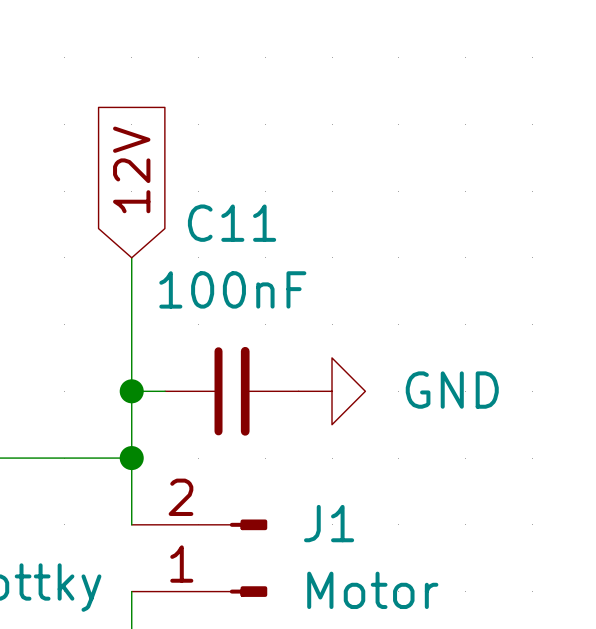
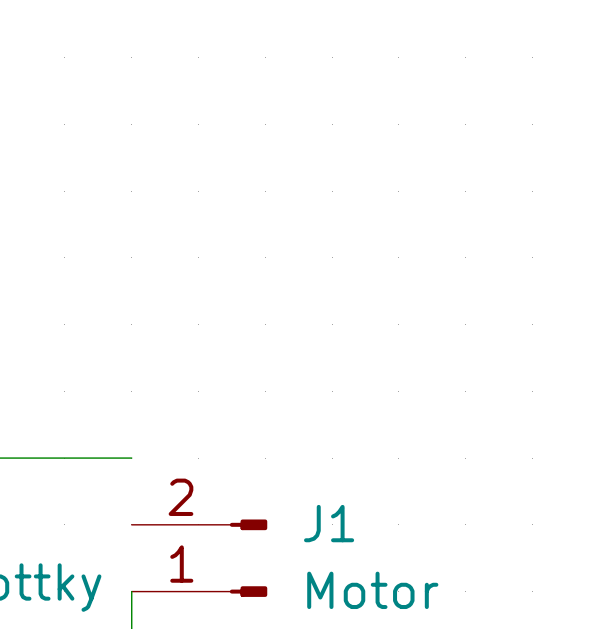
global label: 12V (131, 169) -> none
wire: (131, 257) (131, 524) -> none
wire: (131, 391) (165, 391) -> none
junction: (131, 391) -> none
C11: 100nF (231, 391) -> none
power symbol: GND (332, 391) -> none
junction: (131, 458) -> none

